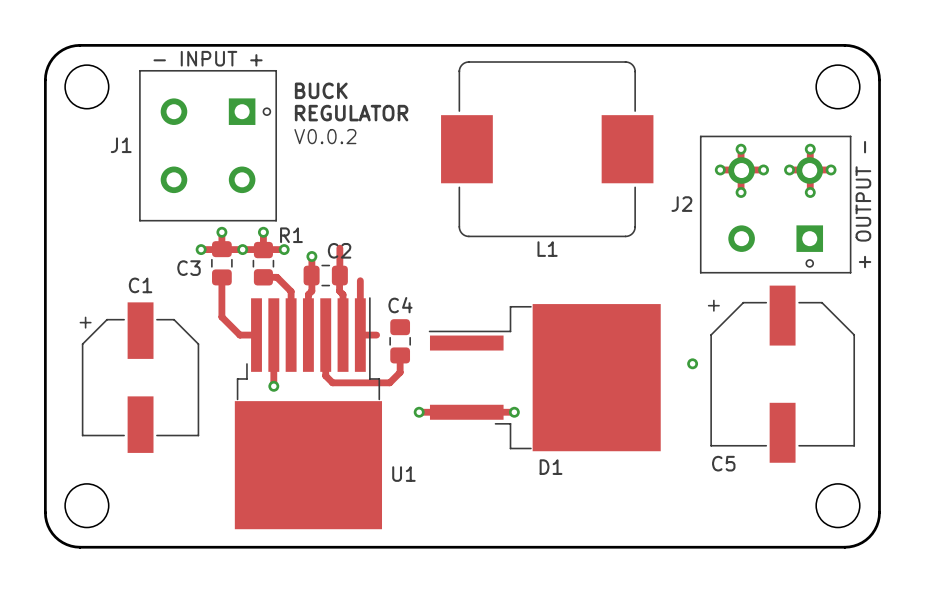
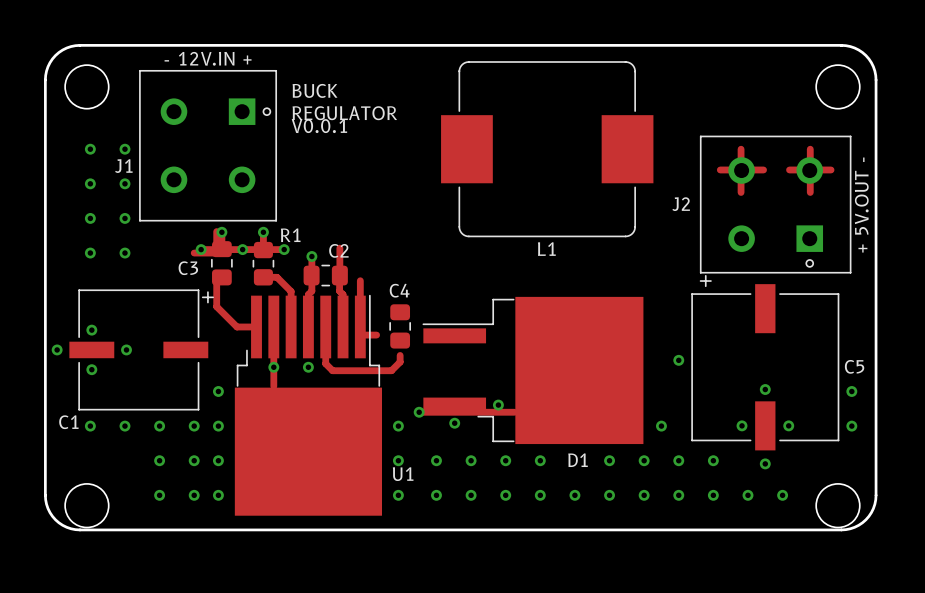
board edge: (841, 45) (858, 48) (869, 55) (876, 66) (879, 79) (879, 512) (874, 529) (862, 542) (844, 547) (79, 547) (62, 542) (50, 529) (45, 517) (45, 495) -> (841, 45) (854, 48) (865, 55) (873, 66) (876, 79) (876, 495) (871, 512) (858, 525) (841, 529) (79, 529) (66, 527) (55, 519) (48, 508) (45, 495)
J1 value: - INPUT + (208, 58) -> - 12V.IN + (208, 58)
text: V0.0.2 (325, 136) -> V0.0.1 (319, 126)
J1 name position: J1 (121, 145) -> J1 (123, 166)
via: none -> (90, 149)
via: none -> (124, 149)
via: (741, 149) -> none
via: (810, 149) -> none
via: (720, 169) -> none
via: (763, 169) -> none
via: (789, 169) -> none
via: (831, 169) -> none
via: none -> (90, 183)
via: none -> (124, 183)
via: (741, 192) -> none
via: (810, 192) -> none
J2 value: + OUTPUT - (863, 204) -> + 5V.OUT - (861, 205)
via: none -> (90, 218)
via: none -> (124, 218)
track: none -> (216, 231) (216, 253) (194, 253)
via: none -> (90, 253)
via: none -> (124, 253)
track: (221, 277) (221, 317) (239, 335) (256, 335) -> none
track: none -> (216, 280) (216, 306) (237, 326) (256, 326)
C1 name position: C1 (140, 285) -> C1 (68, 422)
C5 footprint: [707, 285, 856, 463] -> [691, 275, 840, 451]
U1 footprint: [234, 297, 383, 530] -> [234, 294, 383, 516]
C1 footprint: [79, 302, 200, 453] -> [69, 289, 214, 411]
D1 footprint: [428, 304, 661, 452] -> [422, 296, 644, 445]
via: none -> (91, 330)
C4 position: (400, 341) -> (400, 326)
via: none -> (57, 349)
via: none -> (126, 349)
track: (400, 362) (400, 372) (389, 382) (332, 382) (325, 375) (325, 363) -> (400, 362) (391, 370) (332, 370) (325, 363)
via position: (692, 363) -> (678, 360)
via: none -> (308, 367)
via: none -> (91, 369)
via position: (273, 386) -> (273, 367)
via: none -> (765, 389)
via: none -> (218, 391)
via: none -> (851, 391)
via position: (514, 412) -> (498, 405)
via: none -> (454, 423)
via: none -> (742, 425)
via: none -> (788, 425)
via: none -> (90, 426)
via: none -> (124, 426)
via: none -> (159, 426)
via: none -> (194, 426)
via: none -> (218, 426)
via: none -> (398, 426)
via: none -> (661, 426)
via: none -> (851, 426)
via: none -> (159, 460)
via: none -> (194, 460)
via: none -> (218, 460)
via: none -> (398, 460)
via: none -> (436, 460)
via: none -> (471, 460)
via: none -> (505, 460)
via: none -> (540, 460)
via: none -> (609, 460)
via: none -> (644, 460)
via: none -> (678, 460)
via: none -> (713, 460)
C5 name position: C5 (723, 463) -> C5 (854, 366)
via: none -> (765, 463)
D1 name position: D1 (551, 467) -> D1 (578, 460)
via: none -> (159, 495)
via: none -> (194, 495)
via: none -> (218, 495)
via: none -> (398, 495)
via: none -> (436, 495)
via: none -> (471, 495)
via: none -> (505, 495)
via: none -> (540, 495)
via: none -> (574, 495)
via: none -> (609, 495)
via: none -> (644, 495)
via: none -> (678, 495)
via: none -> (713, 495)
via: none -> (747, 495)
via: none -> (782, 495)

